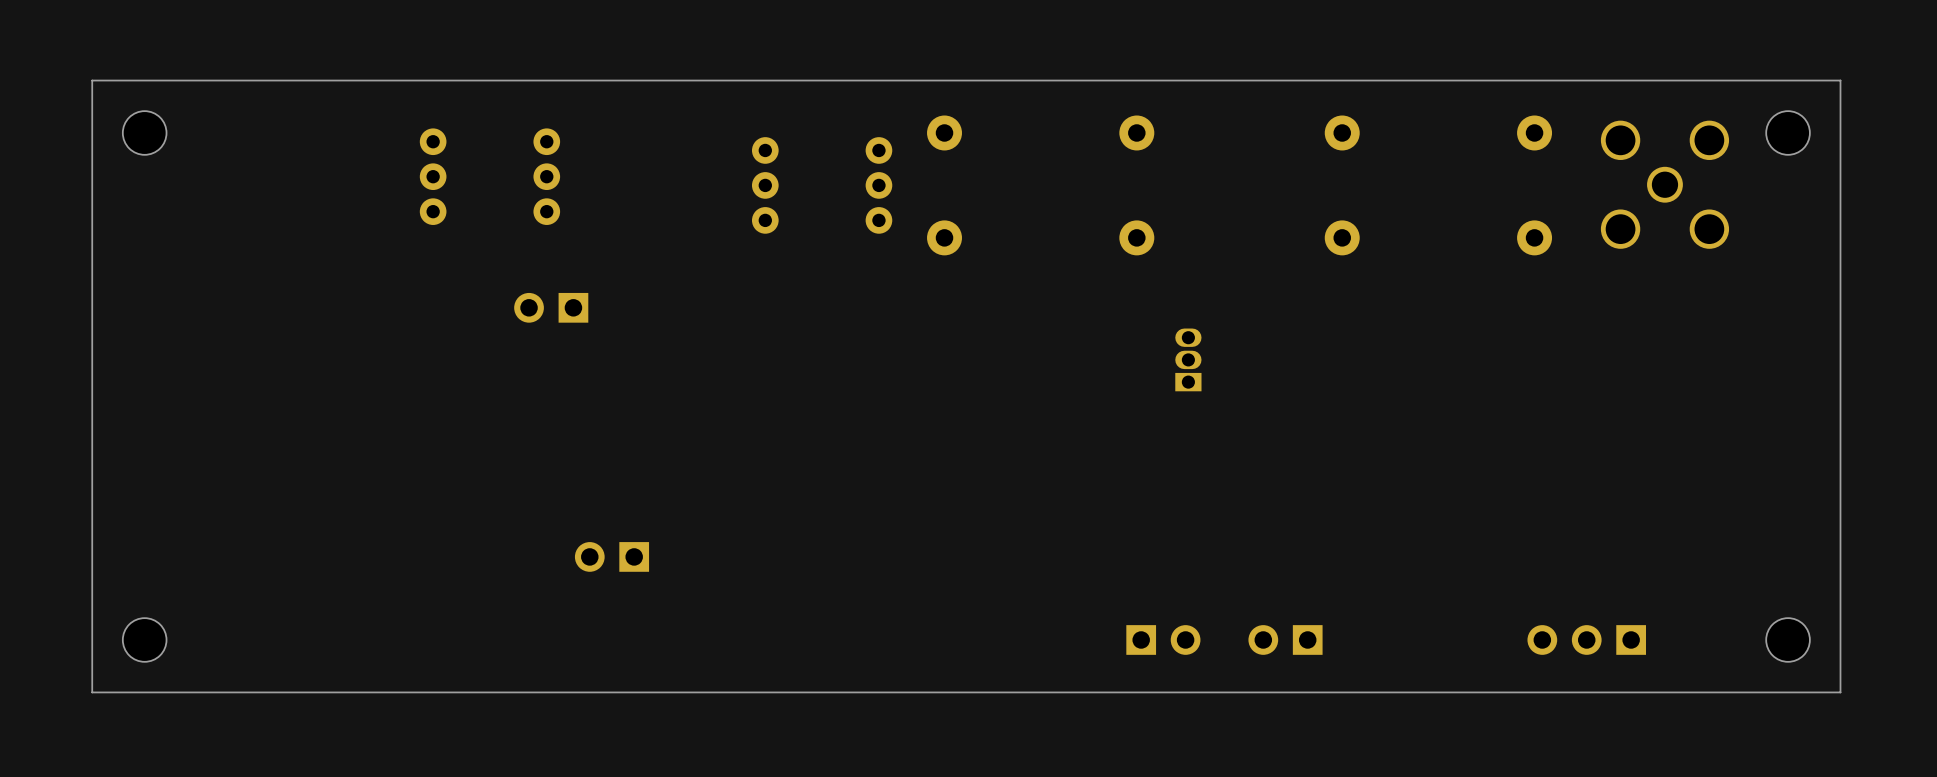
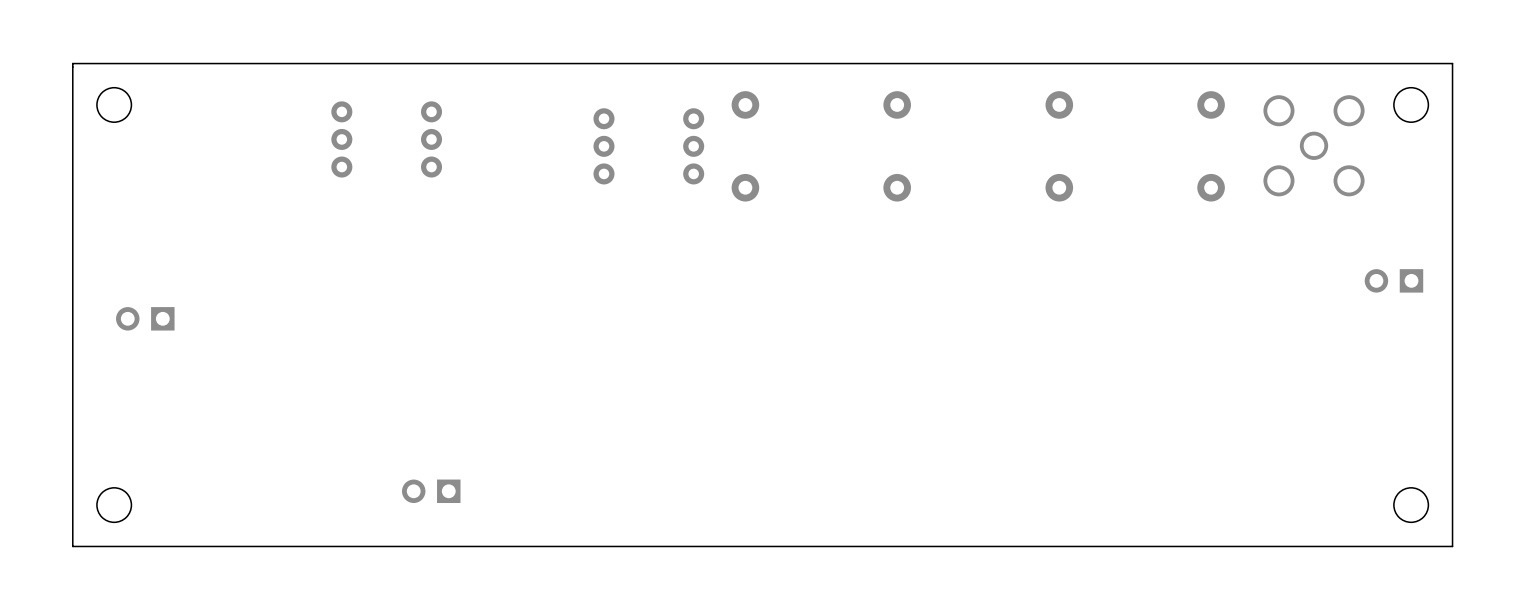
part: (551, 307) -> none
part: none -> (1393, 280)
part: (1188, 359) -> none
part: none -> (145, 318)
part position: (611, 556) -> (431, 491)
part: (1163, 639) -> none
part: (1285, 639) -> none
part: (1586, 639) -> none

